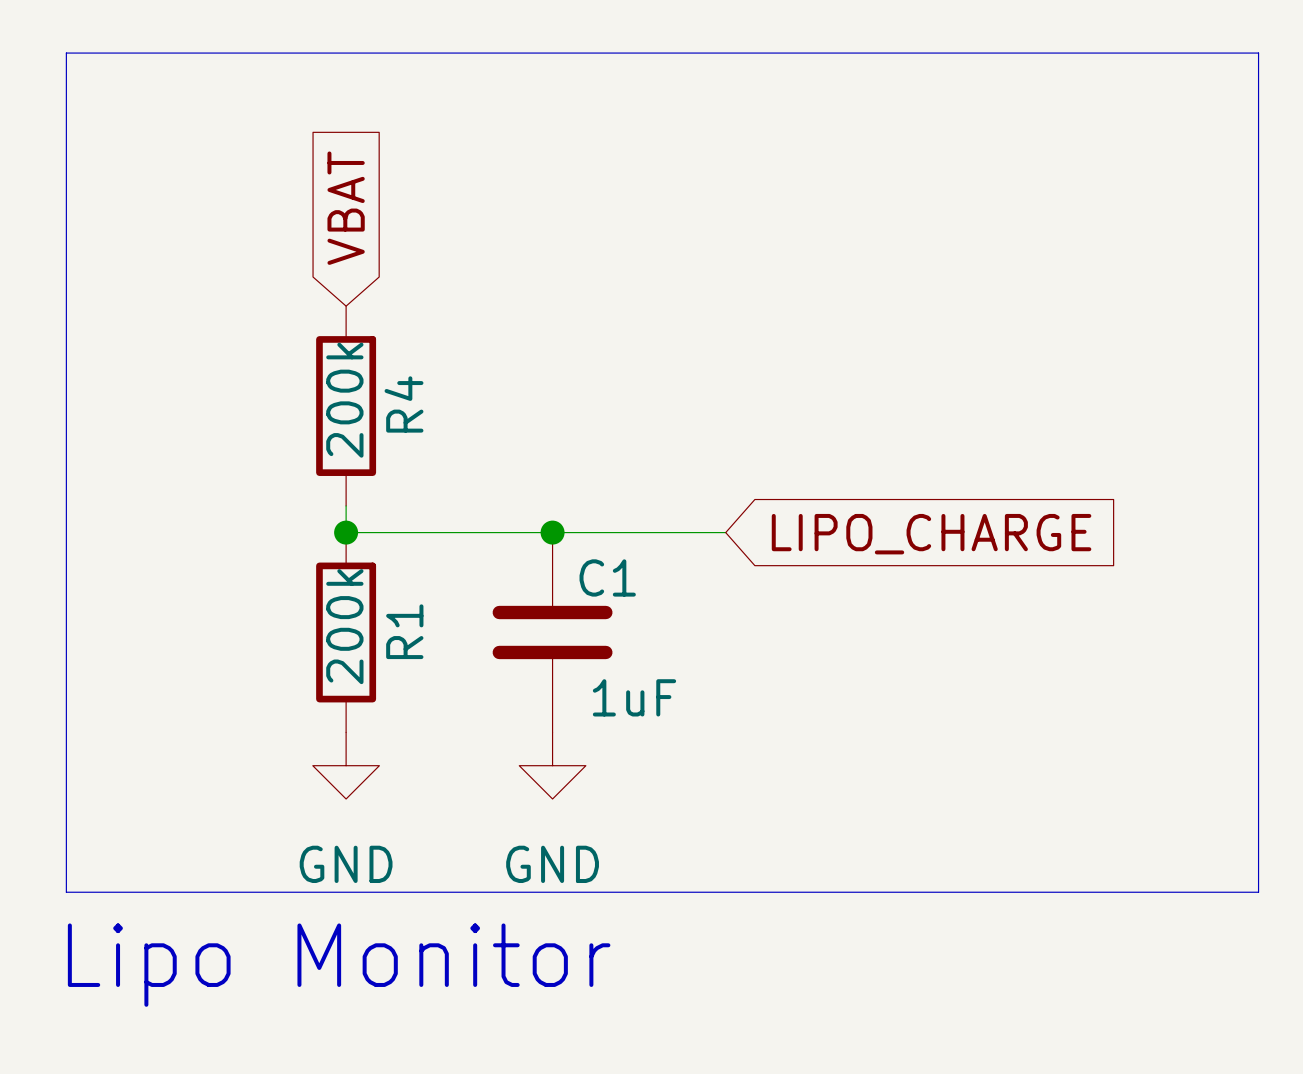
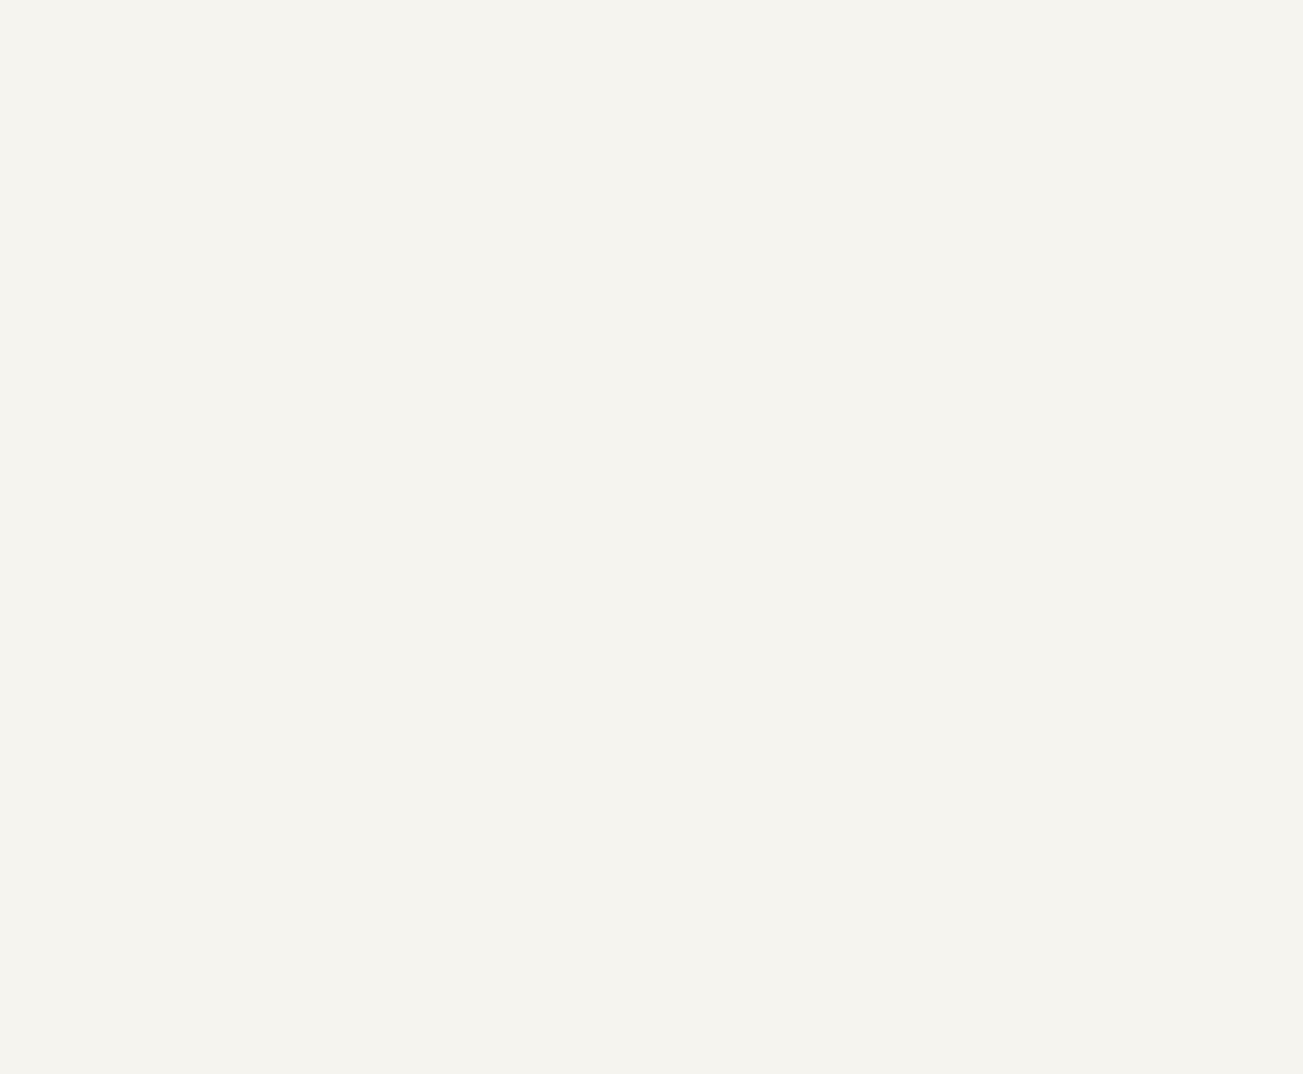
line: (66, 53) (1258, 53) (1258, 892) (66, 892) (66, 53) -> none
global label: VBAT (346, 208) -> none
R4: 200k (346, 406) -> none
wire: (346, 505) (346, 532) (725, 532) -> none
junction: (346, 532) -> none
junction: (552, 532) -> none
global label: LIPO_CHARGE (931, 534) -> none
R1: 200k (346, 632) -> none
C1: 1uF (552, 632) -> none
power symbol: GND (346, 765) -> none
power symbol: GND (552, 765) -> none
text: Lipo Monitor (339, 965) -> none

